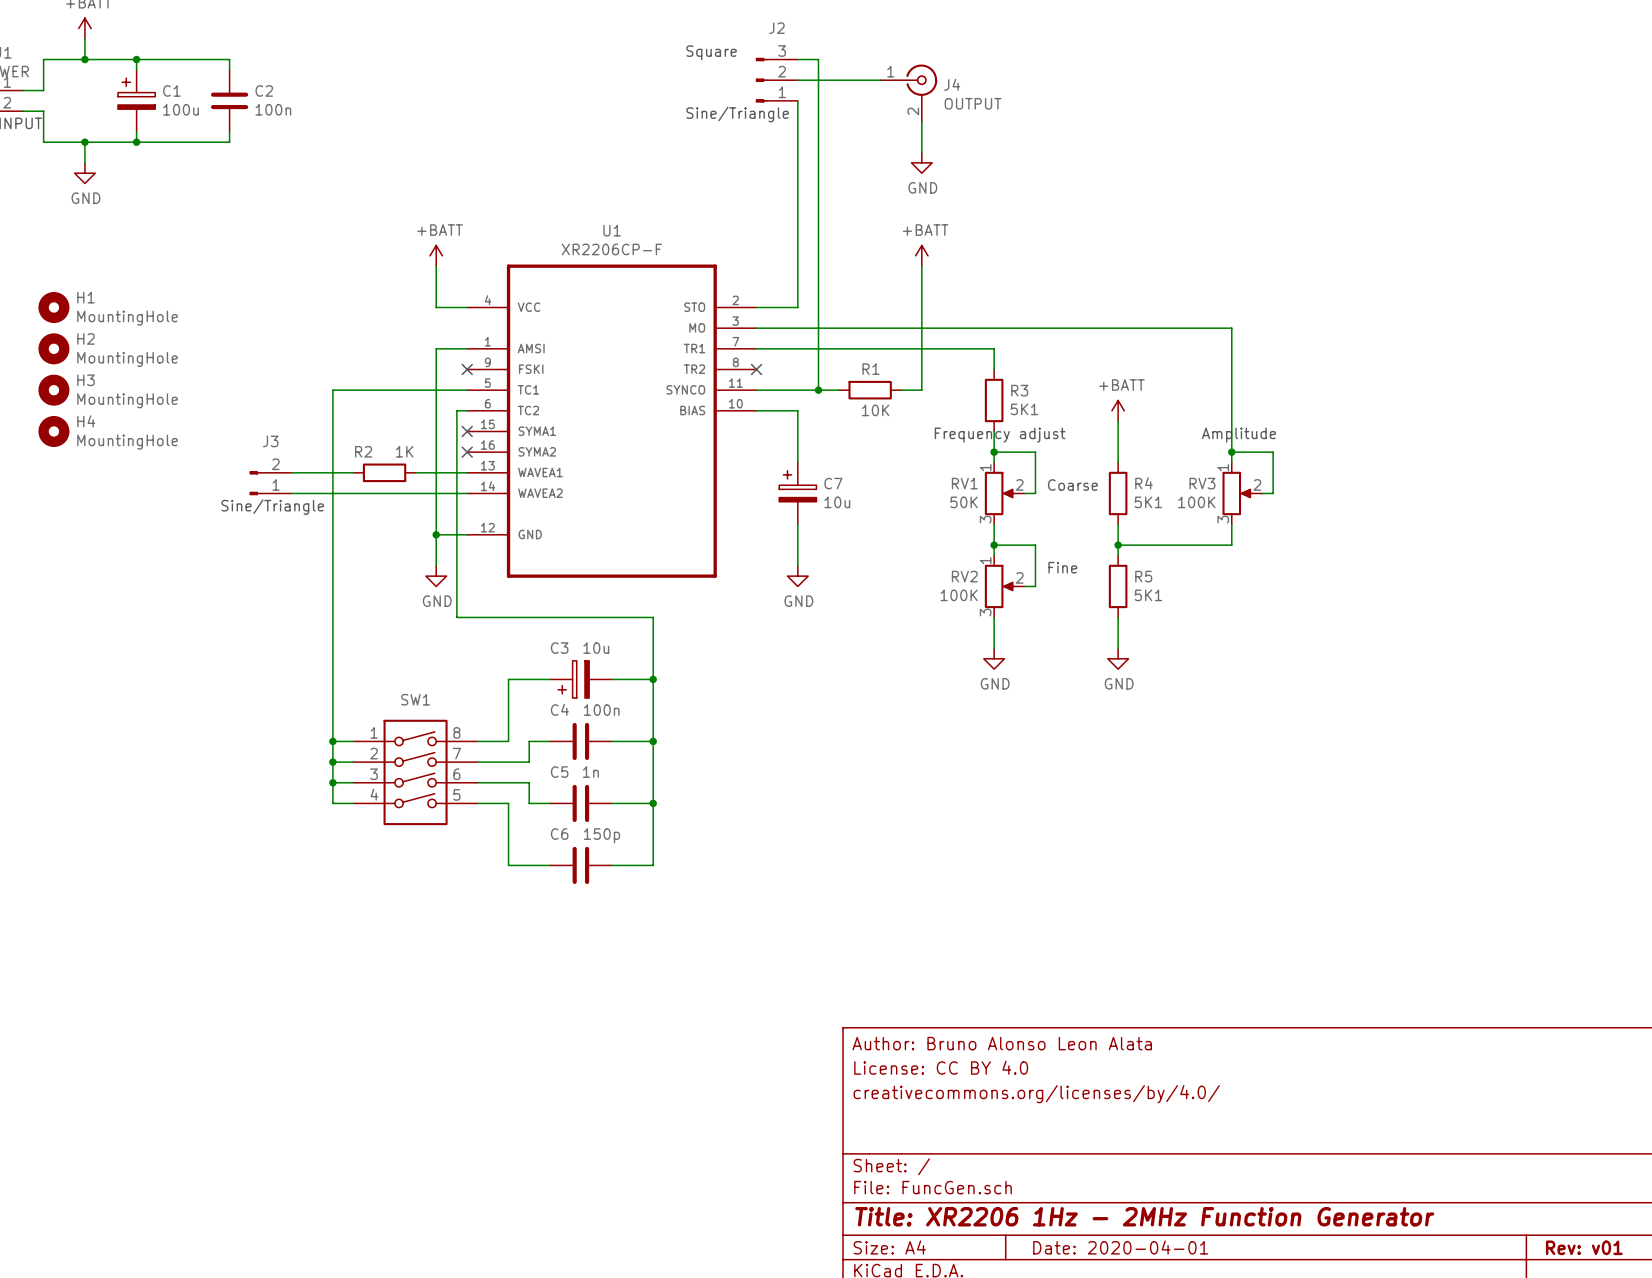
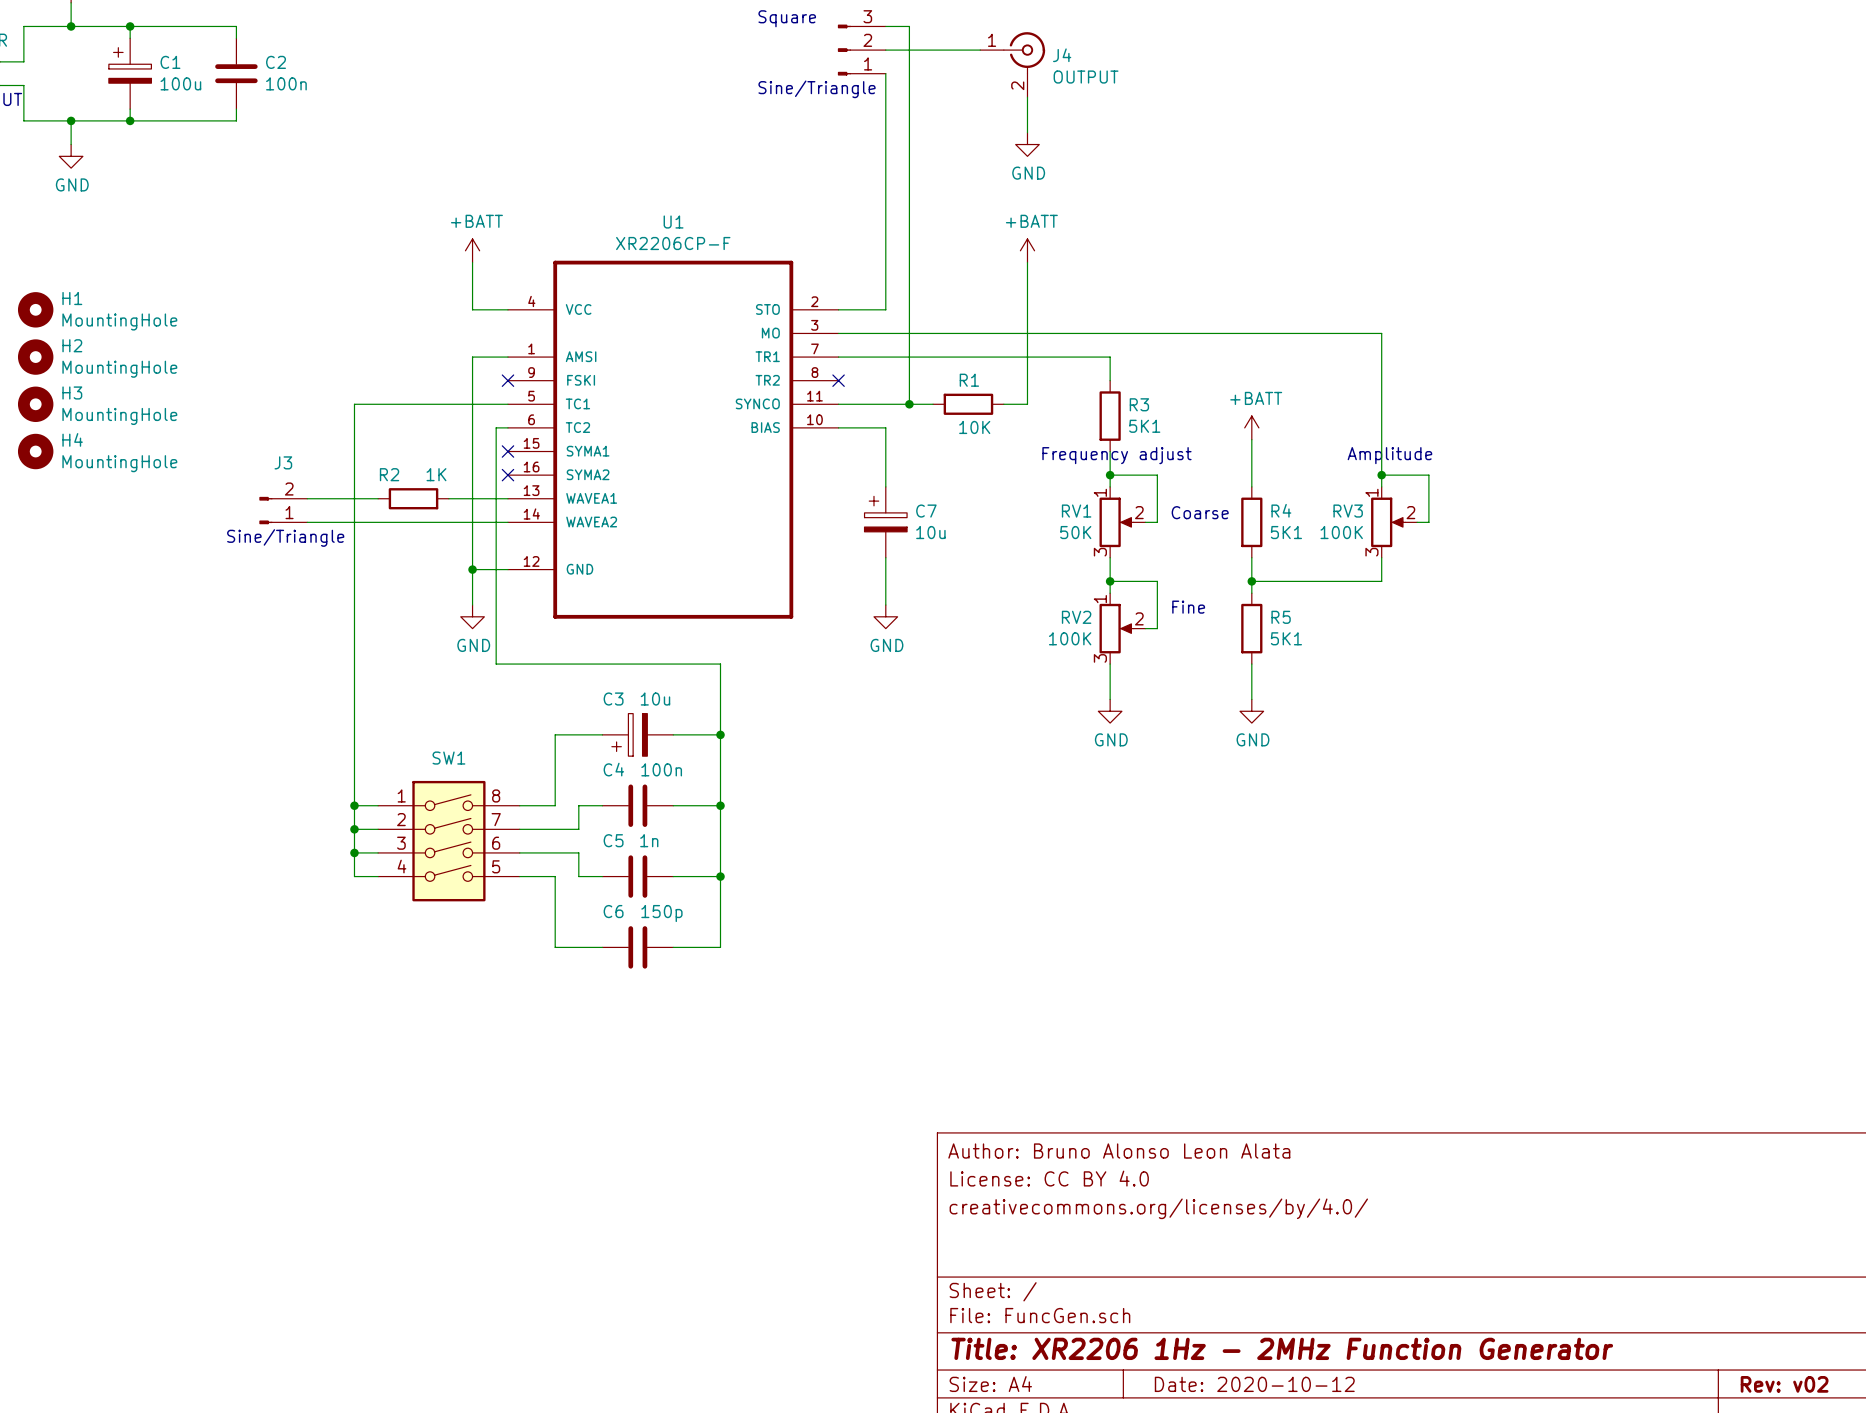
title block: Date: 2020-04-01 (1120, 1247) -> Date: 2020-10-12 (1254, 1384)
title block: Rev: v01 (1584, 1247) -> Rev: v02 (1784, 1384)

